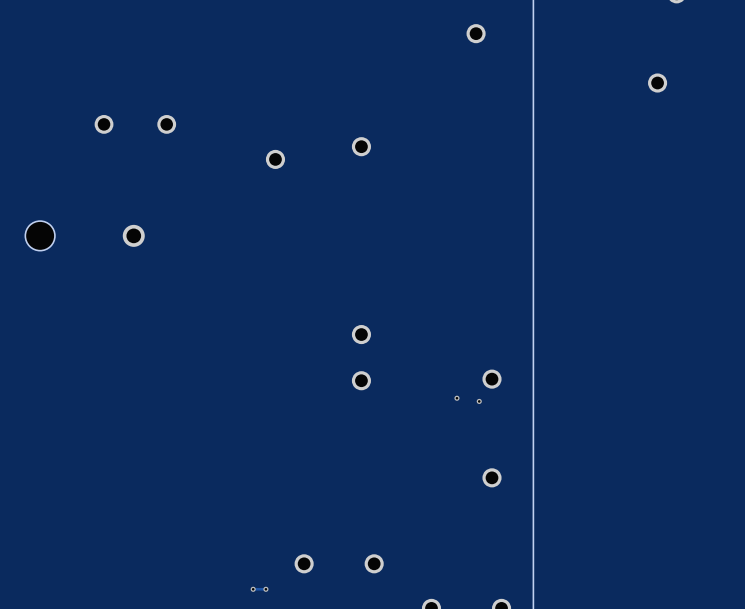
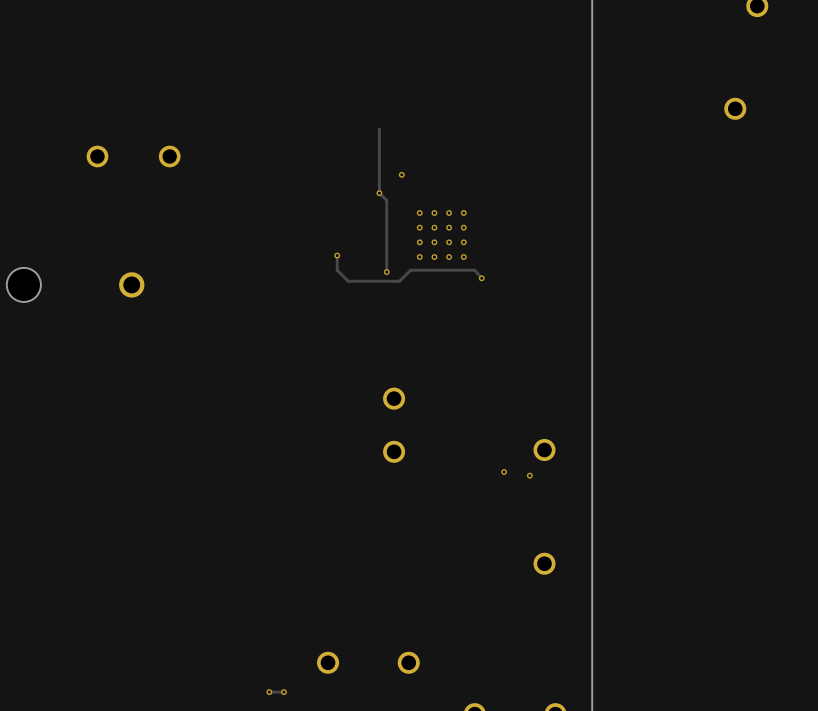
part: (476, 33) -> none
track: none -> (379, 128) (379, 193) (386, 200) (386, 272)
via: none -> (401, 174)
part: (361, 146) -> none
via: none -> (379, 193)
part: (275, 159) -> none
via: none -> (419, 212)
via: none -> (434, 212)
via: none -> (449, 212)
via: none -> (463, 212)
via: none -> (419, 227)
via: none -> (434, 227)
via: none -> (449, 227)
via: none -> (463, 227)
via: none -> (419, 242)
via: none -> (434, 242)
via: none -> (449, 242)
via: none -> (463, 242)
track: none -> (337, 255) (337, 270) (348, 281) (399, 281) (410, 270) (474, 270) (481, 278)
via: none -> (337, 255)
via: none -> (419, 257)
via: none -> (434, 257)
via: none -> (449, 257)
via: none -> (463, 257)
via: none -> (386, 272)
via: none -> (481, 278)

